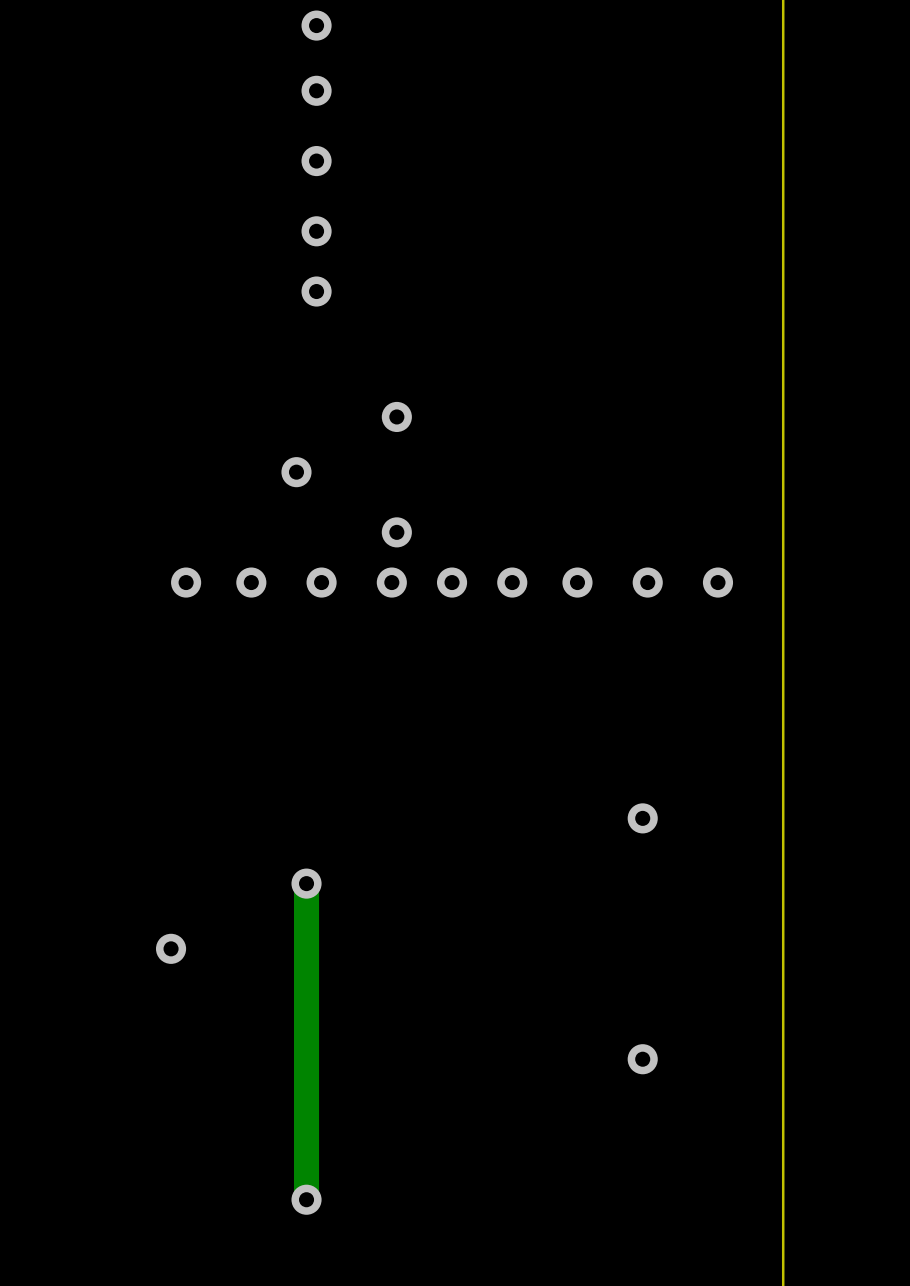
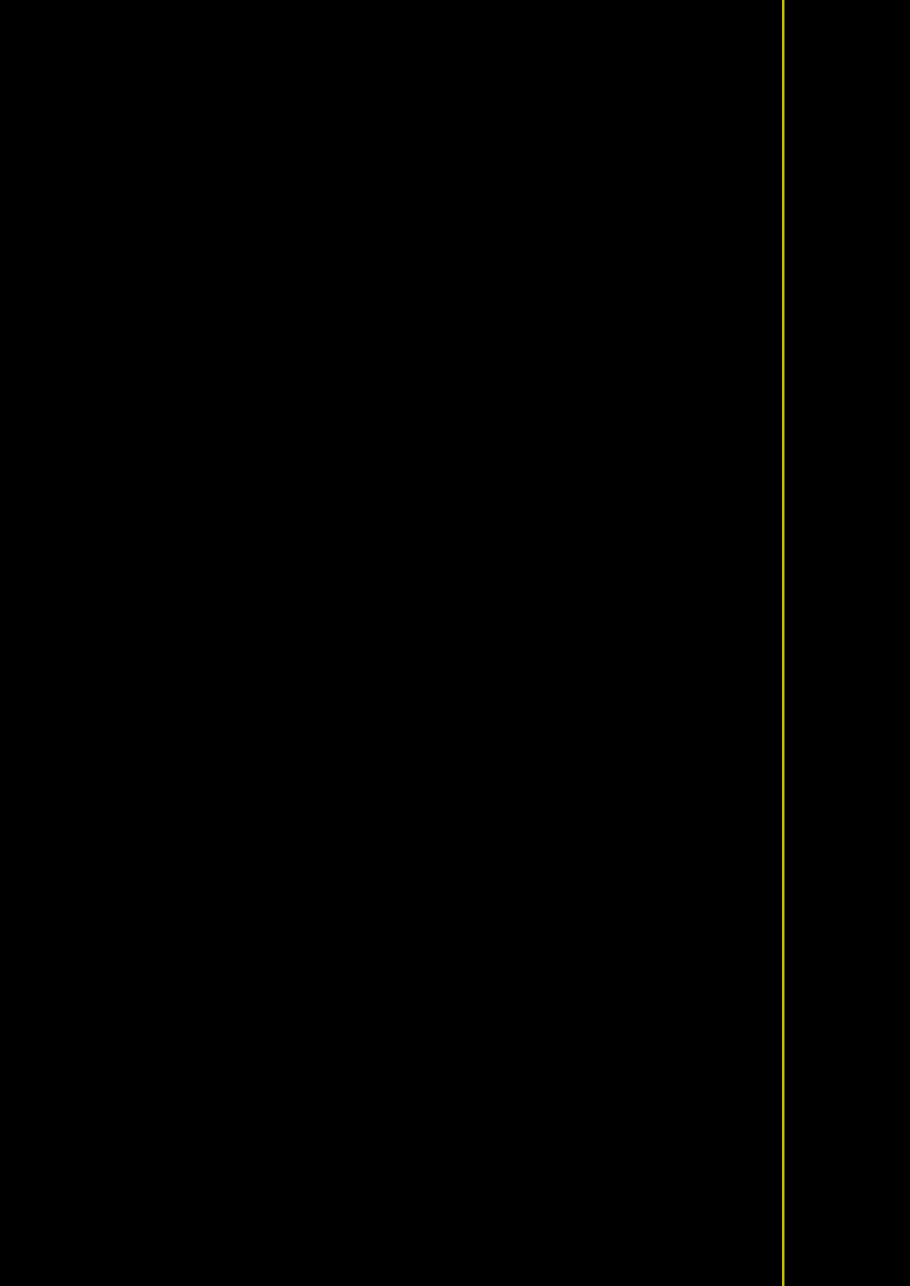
via: (316, 25) -> none
via: (316, 90) -> none
via: (316, 161) -> none
via: (316, 231) -> none
via: (316, 291) -> none
via: (396, 416) -> none
via: (296, 472) -> none
via: (396, 532) -> none
via: (186, 582) -> none
via: (251, 582) -> none
via: (321, 582) -> none
via: (391, 582) -> none
via: (452, 582) -> none
via: (512, 582) -> none
via: (577, 582) -> none
via: (647, 582) -> none
via: (717, 582) -> none
via: (642, 818) -> none
track: (306, 883) (306, 1199) -> none
via: (306, 883) -> none
via: (171, 948) -> none
via: (642, 1059) -> none
via: (306, 1199) -> none

